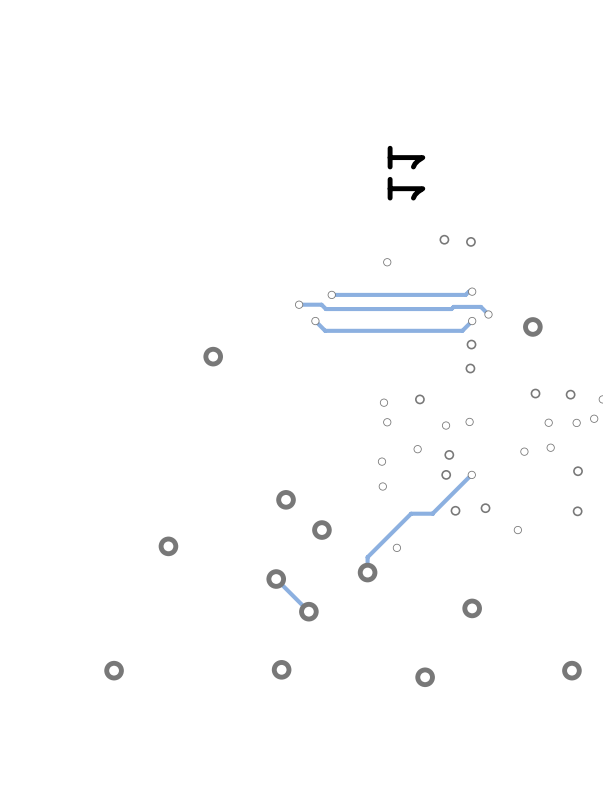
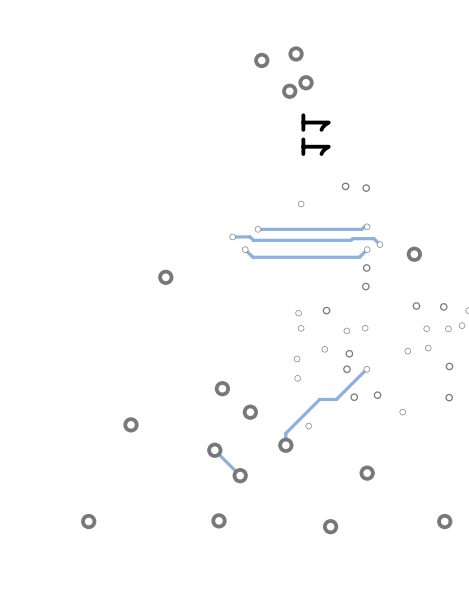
via: none -> (296, 53)
via: none -> (261, 60)
via: none -> (306, 82)
via: none -> (289, 91)

